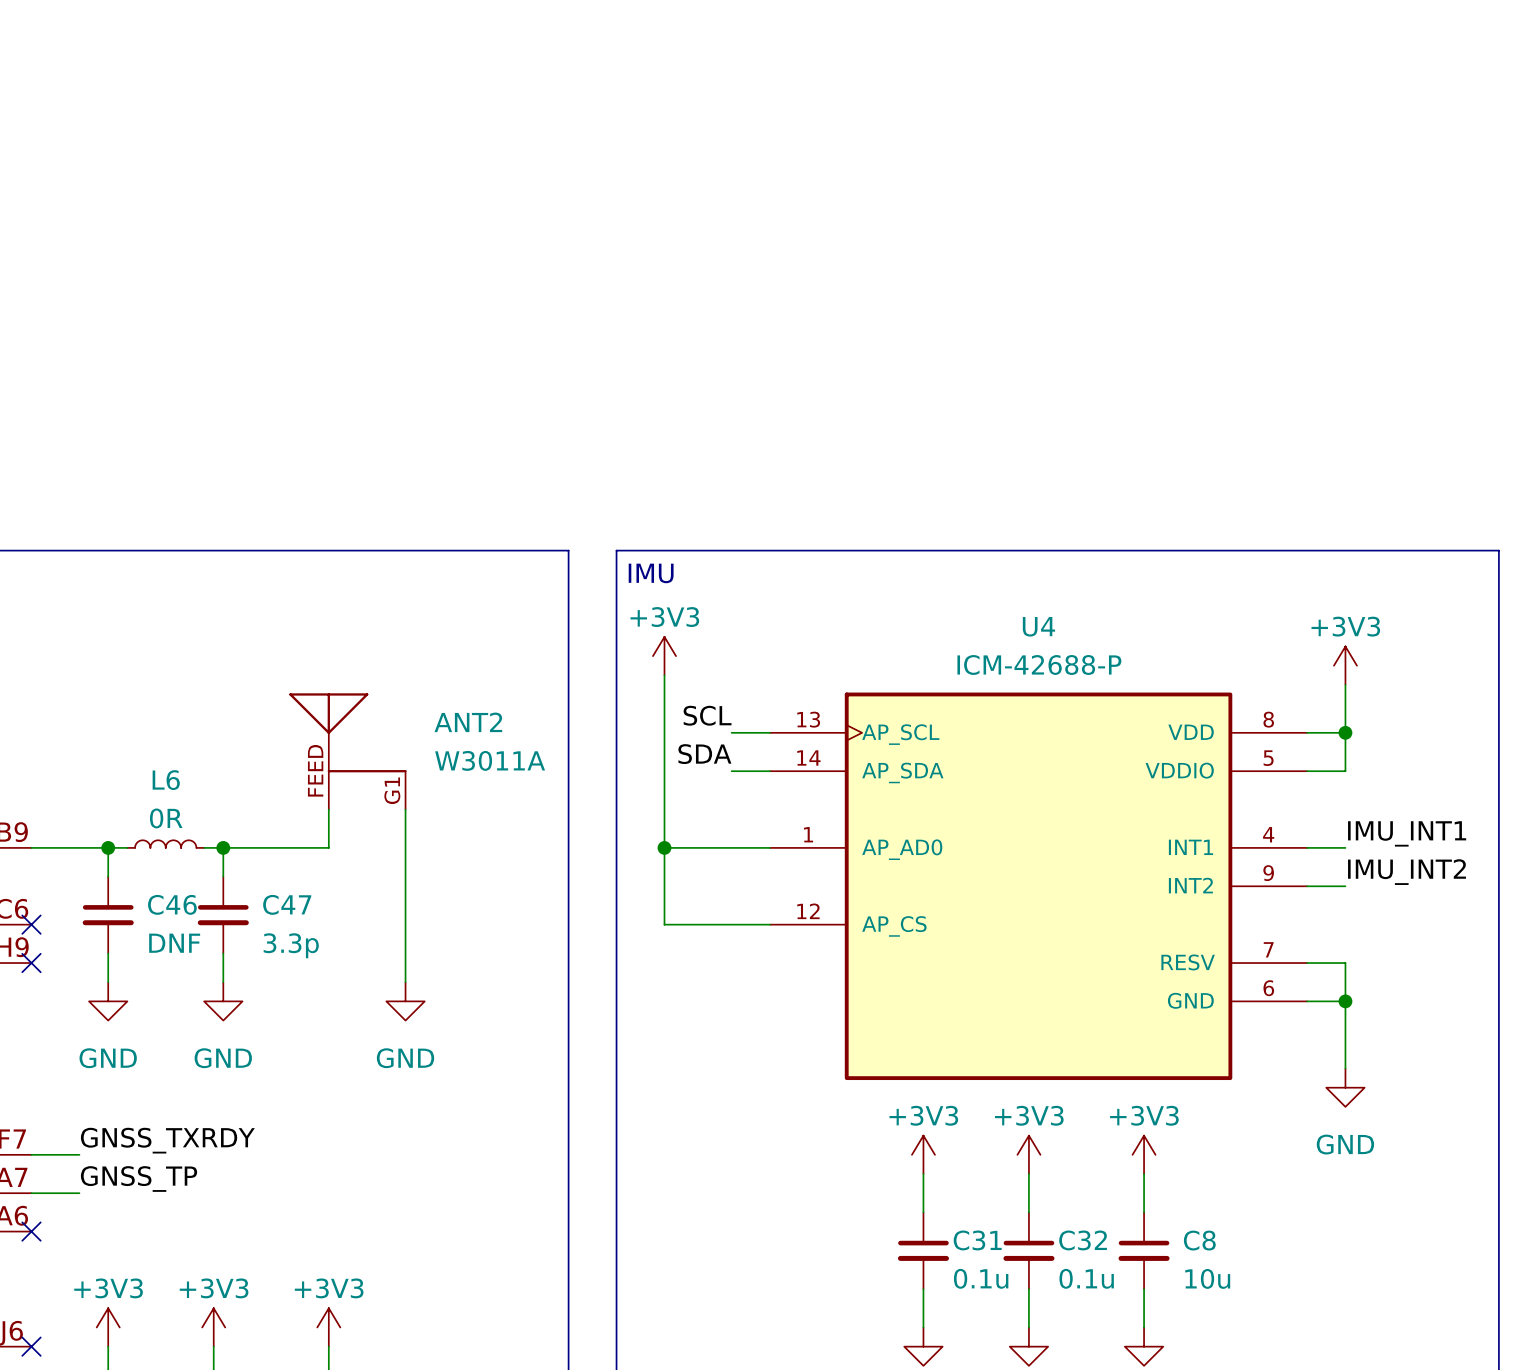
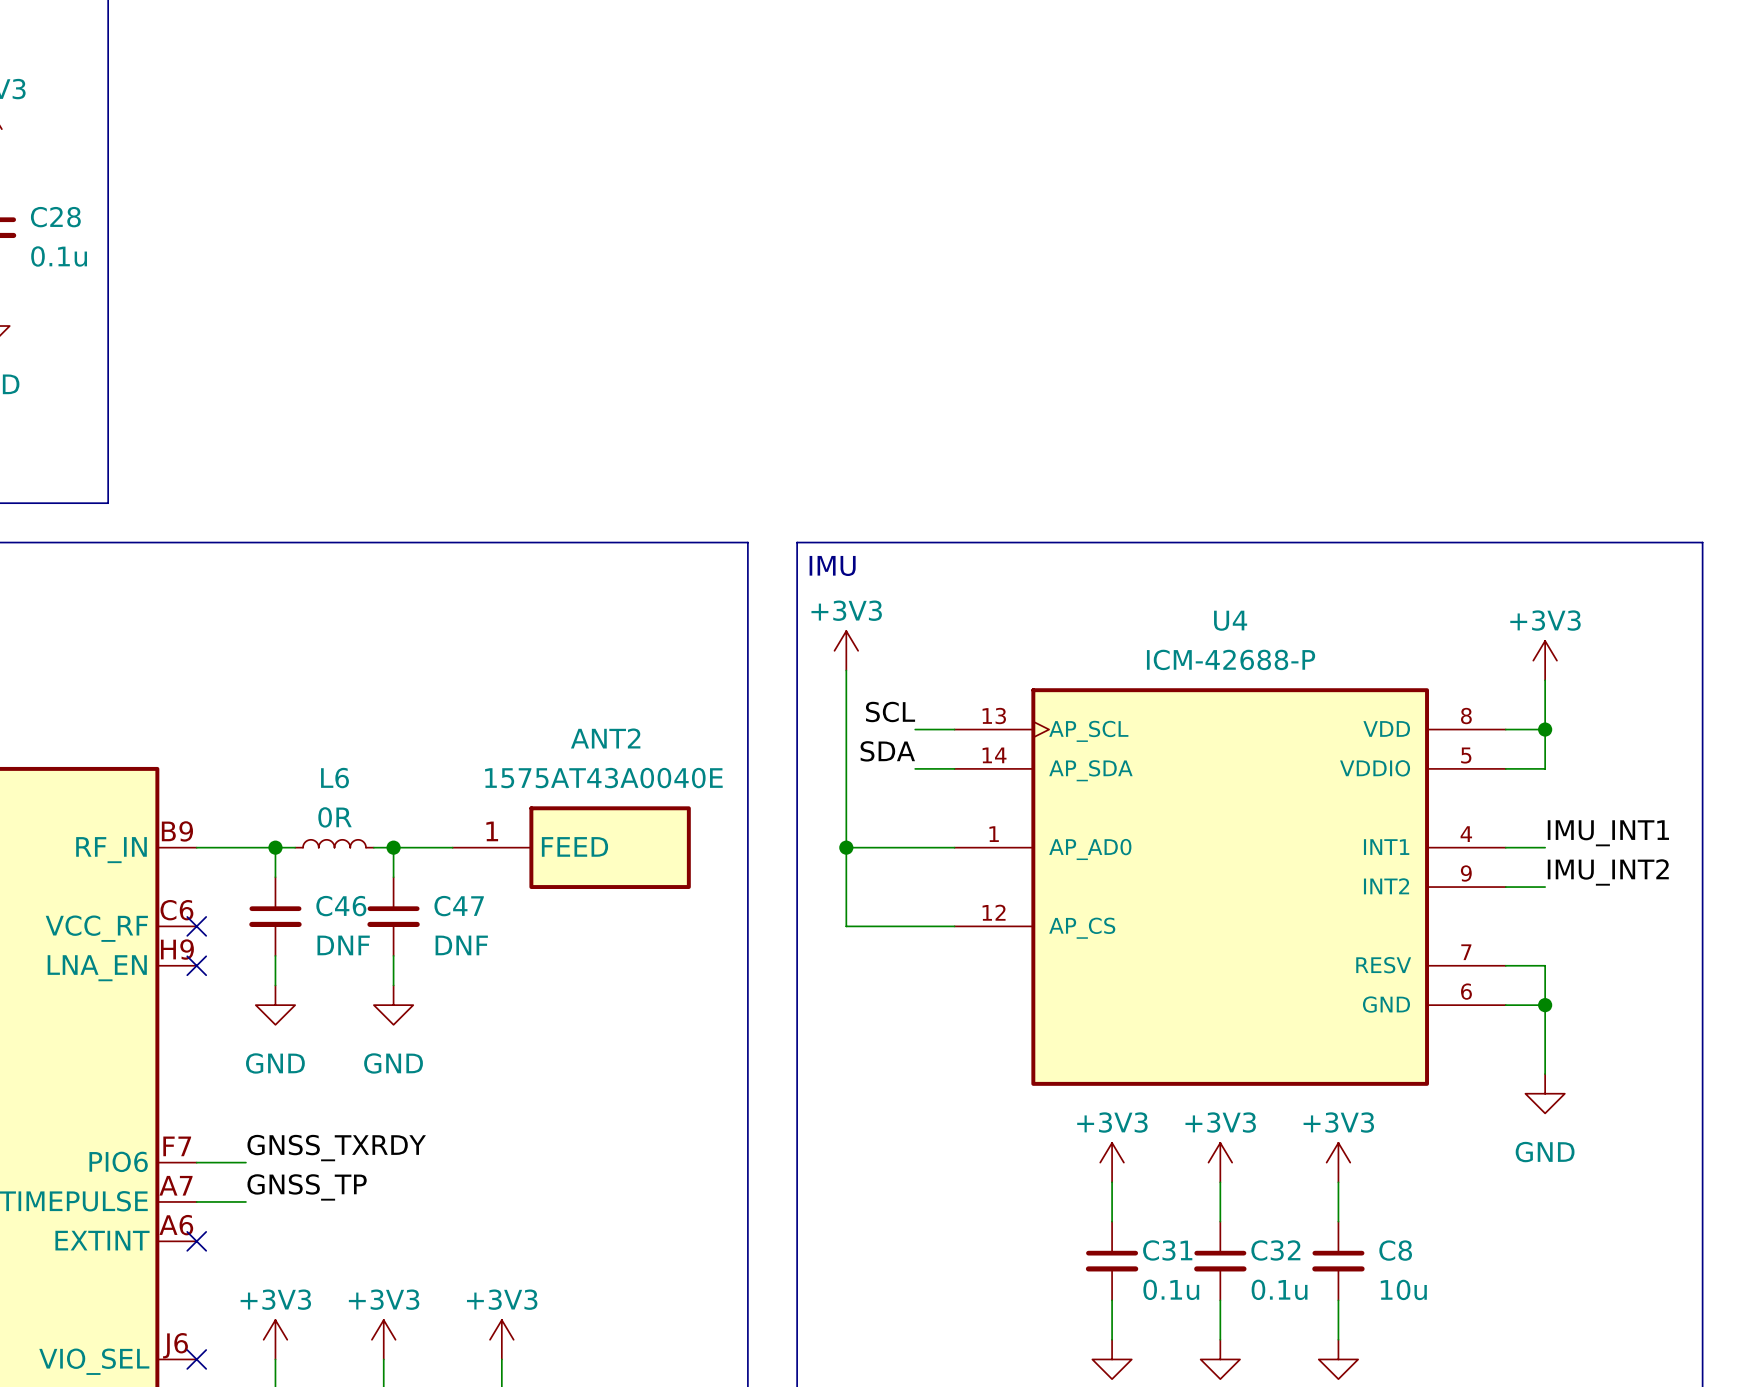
ANT2 symbol: [289, 693, 407, 810] -> [452, 806, 691, 889]
ANT2 name position: ANT2 (468, 722) -> ANT2 (605, 738)
ANT2 value: W3011A (490, 760) -> 1575AT43A0040E (603, 778)
wire: (328, 809) (328, 847) (280, 847) -> none
wire: (405, 809) (405, 982) -> none
C47 value: 3.3p (291, 945) -> DNF (461, 945)
power symbol: GND (405, 1001) -> none

